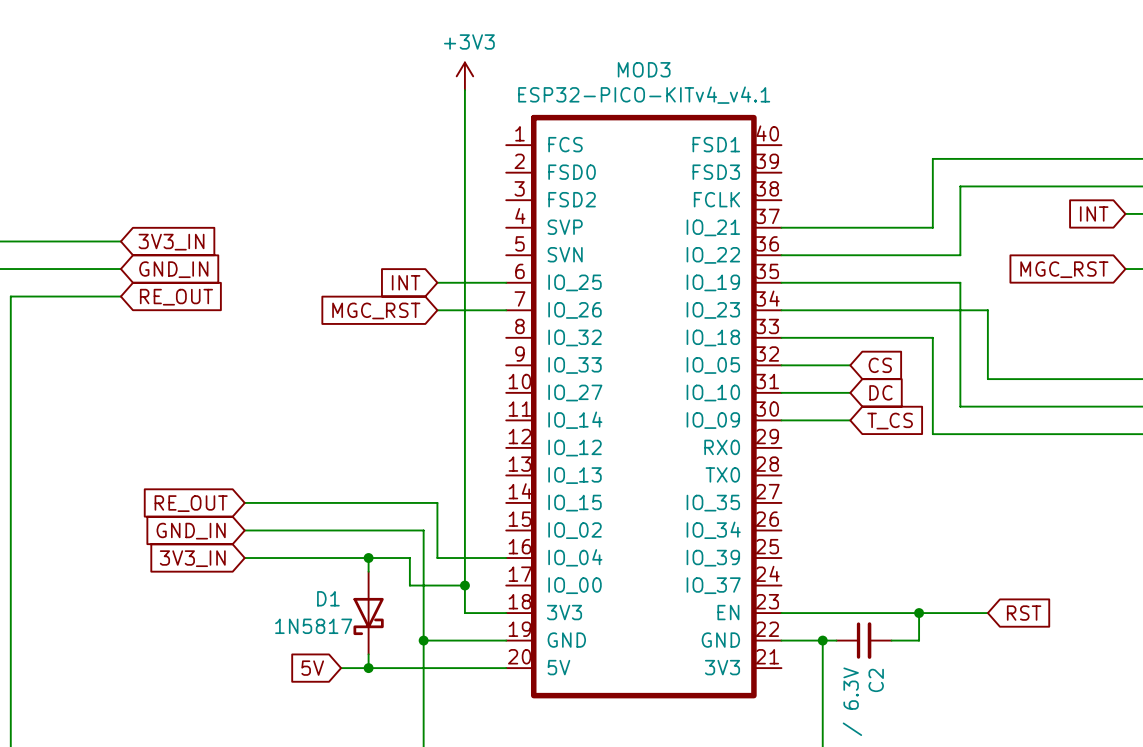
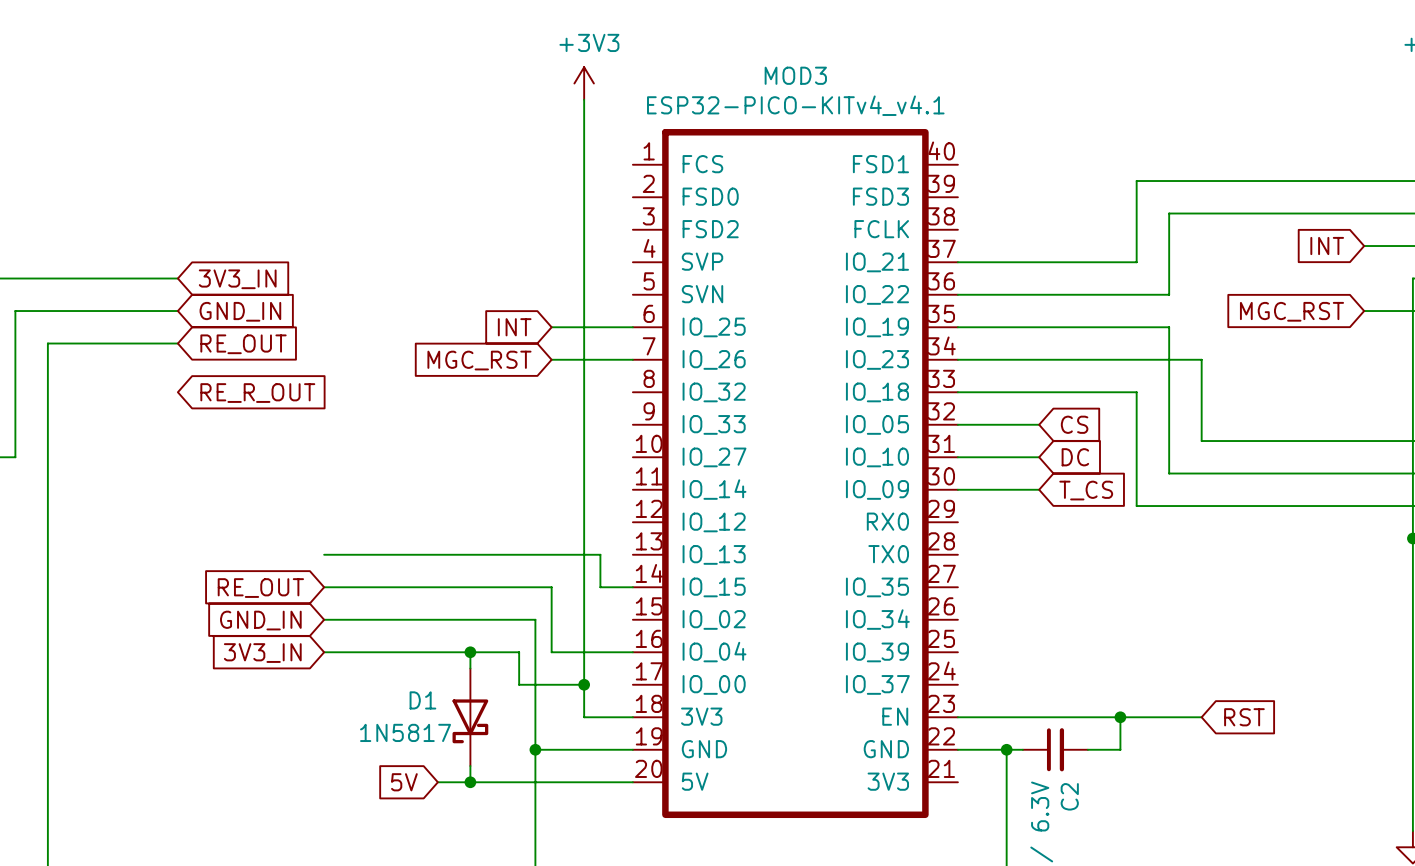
global label: none -> RE_R_OUT (257, 393)
wire: none -> (324, 554) (600, 554) (600, 587) (632, 587)

